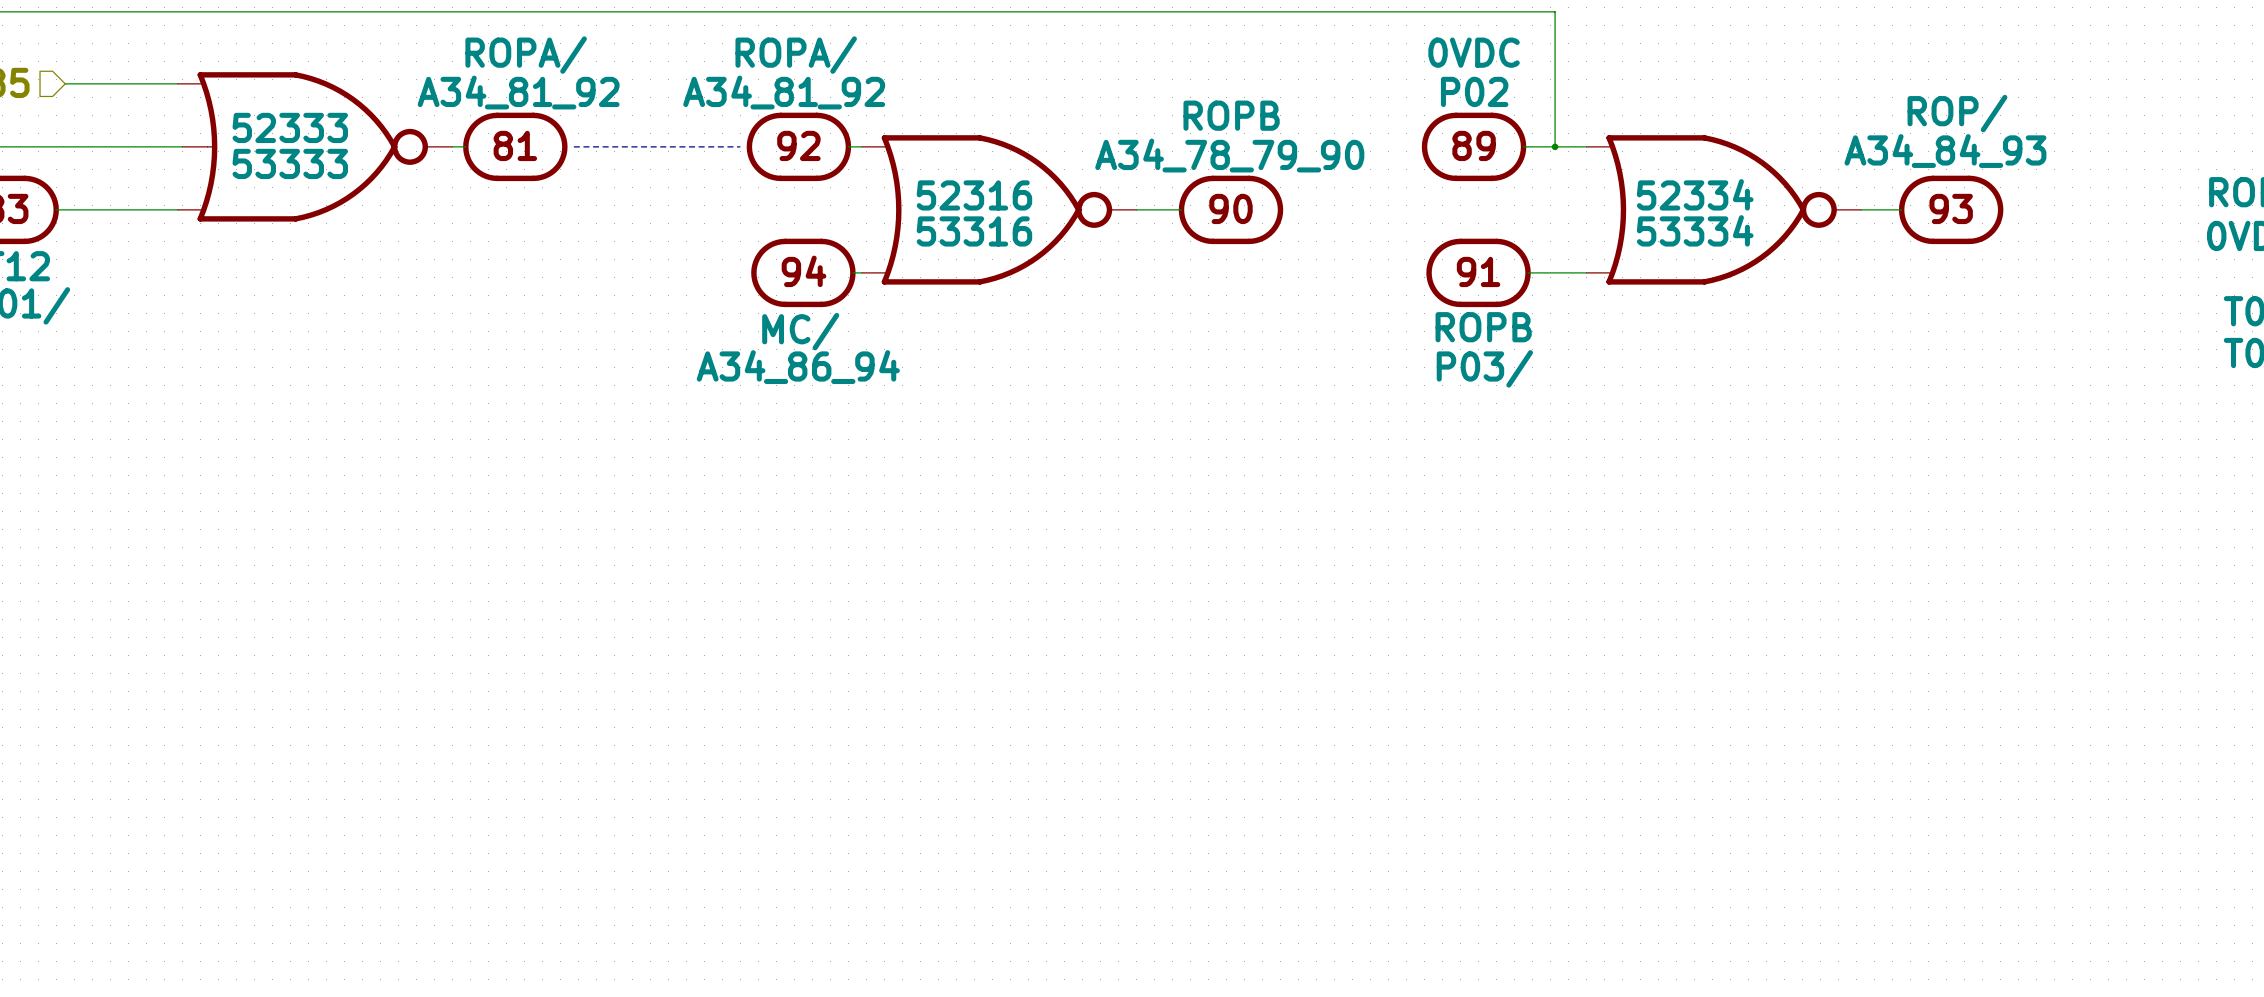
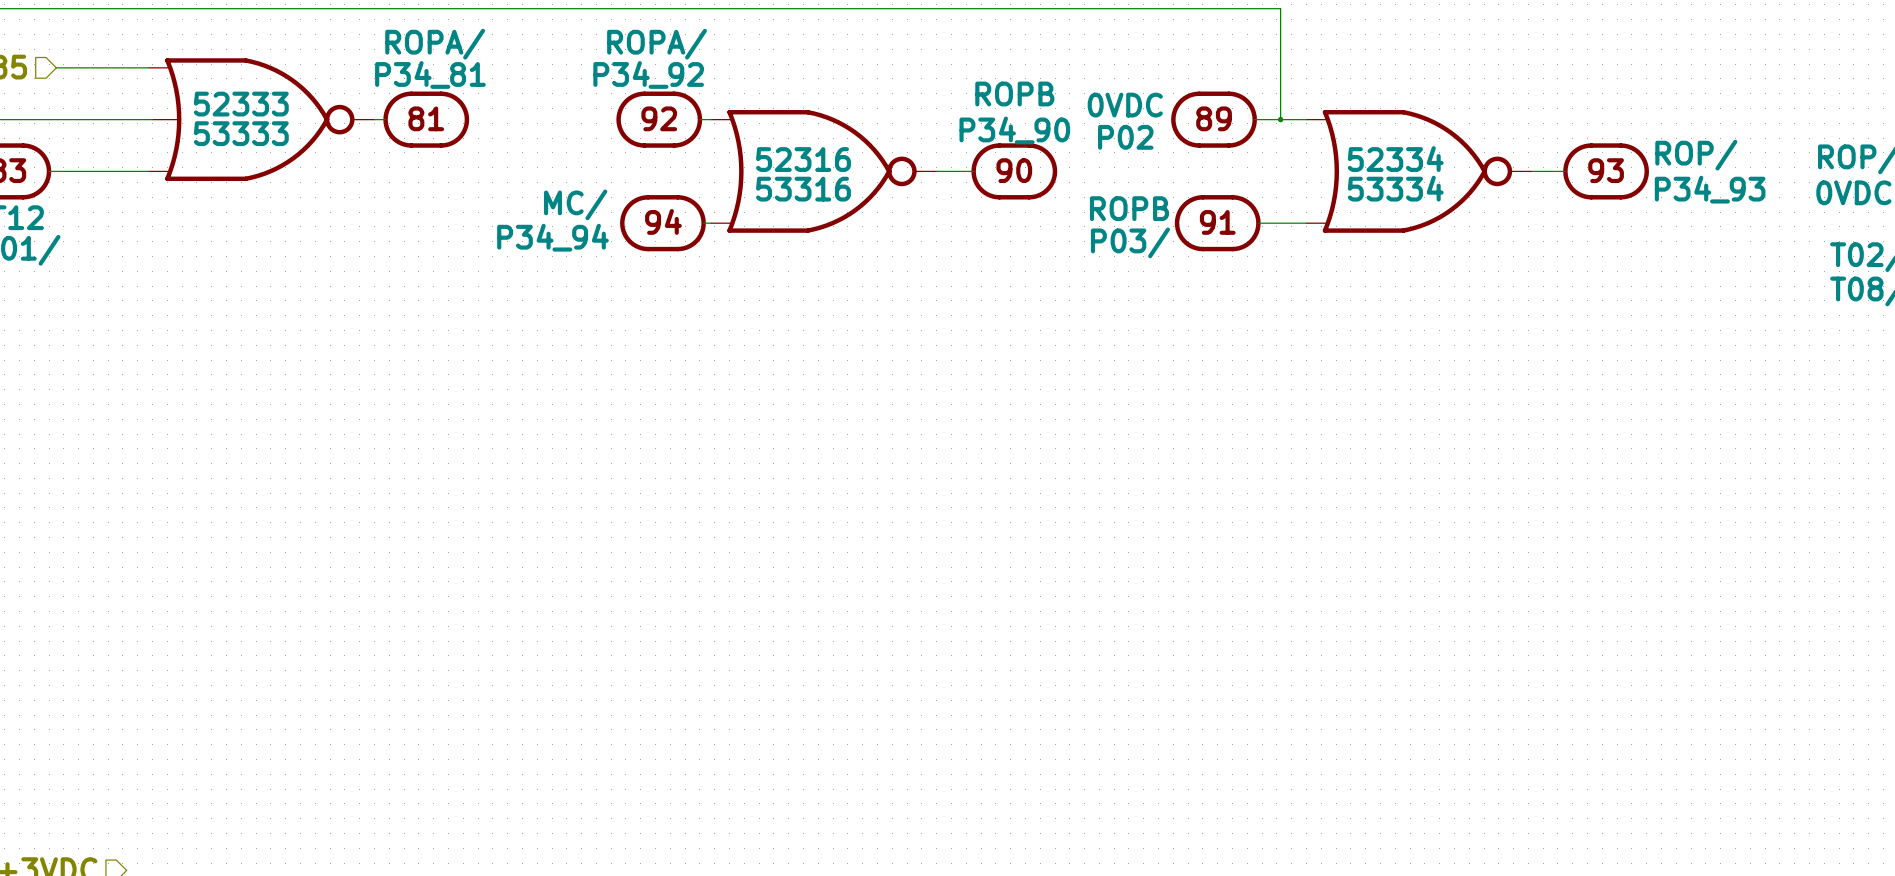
part text position: 0VDC (1474, 52) -> 0VDC (1125, 105)
part text position: P02 (1474, 91) -> P02 (1125, 137)
part text: A34_81_92 (518, 92) -> P34_81 (430, 74)
part text: A34_81_92 (784, 92) -> P34_92 (648, 74)
part text position: ROP/ (1957, 113) -> ROP/ (1696, 155)
line: (573, 146) (740, 146) -> none
part text: A34_84_93 (1945, 151) -> P34_93 (1710, 189)
part text: A34_78_79_90 (1229, 155) -> P34_90 (1014, 130)
part text position: ROPB (1483, 327) -> ROPB (1129, 208)
part text position: MC/ (800, 331) -> MC/ (575, 204)
part text: A34_86_94 (798, 367) -> P34_94 (552, 237)
part text position: P03/ (1484, 368) -> P03/ (1130, 242)

